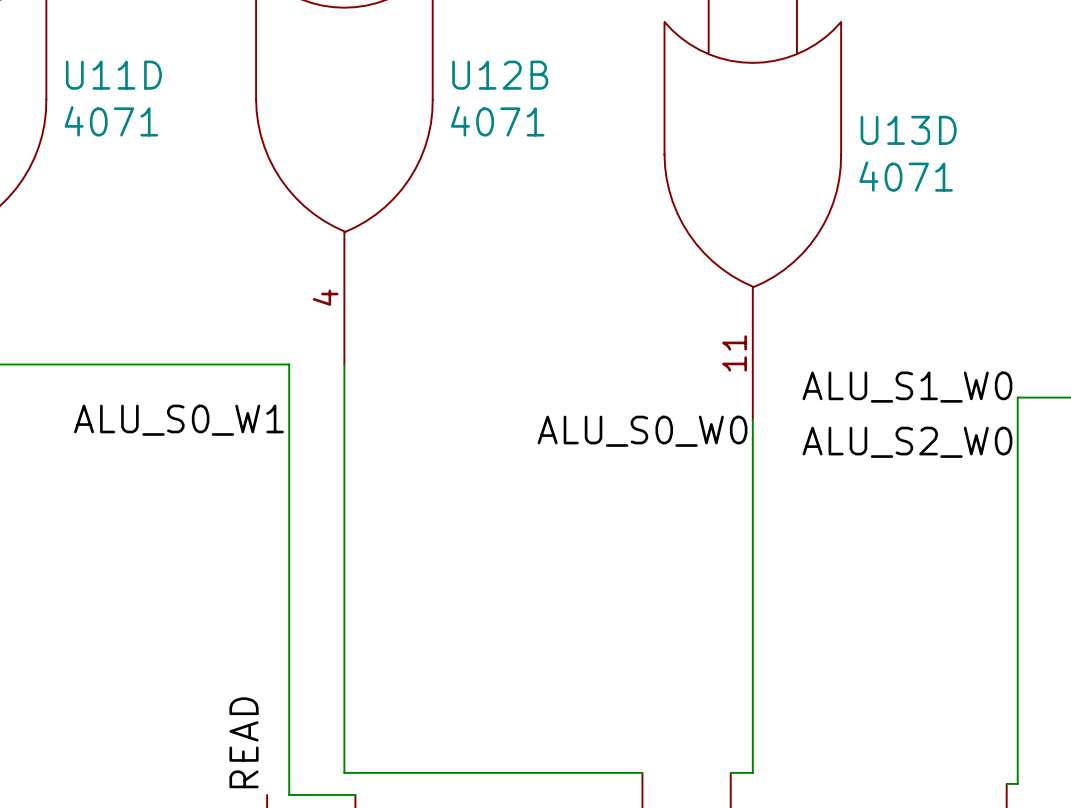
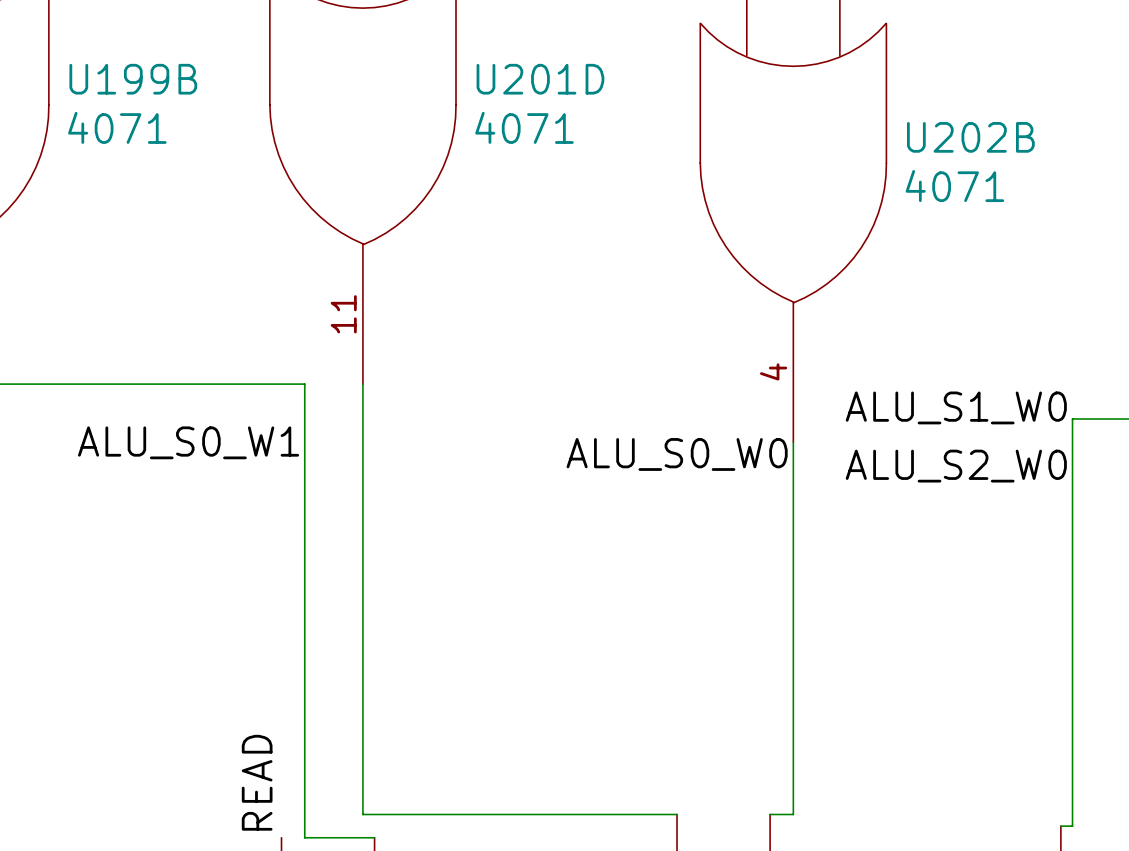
U11D name: U11D (113, 75) -> U199B (133, 79)
U12B name: U12B (500, 75) -> U201D (540, 79)
U13D name: U13D (908, 130) -> U202B (970, 137)
U12B pin number: 4 (325, 297) -> 11 (343, 314)
U13D pin number: 11 (734, 353) -> 4 (773, 371)

